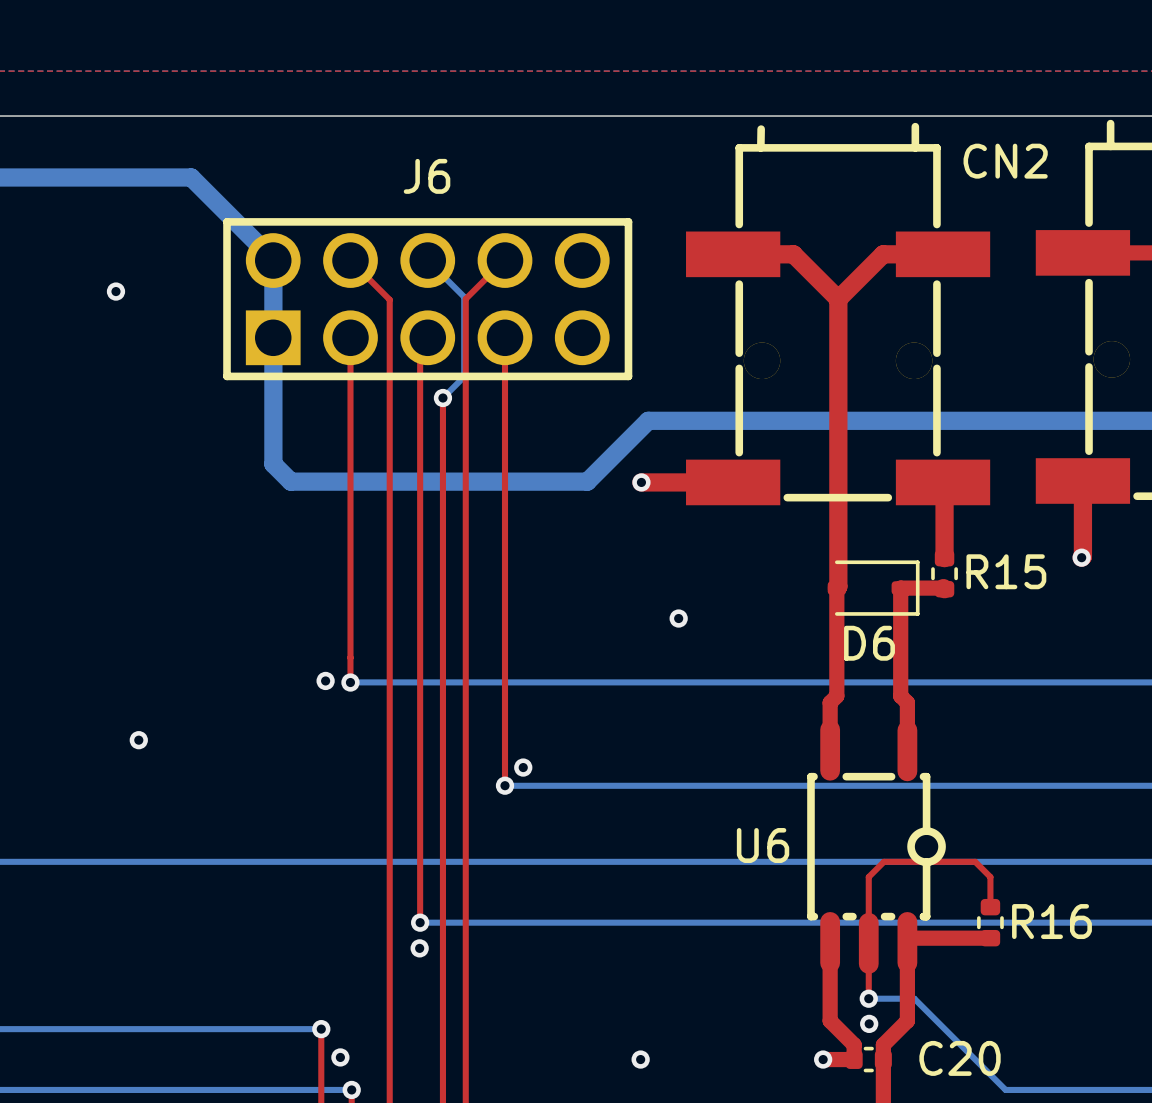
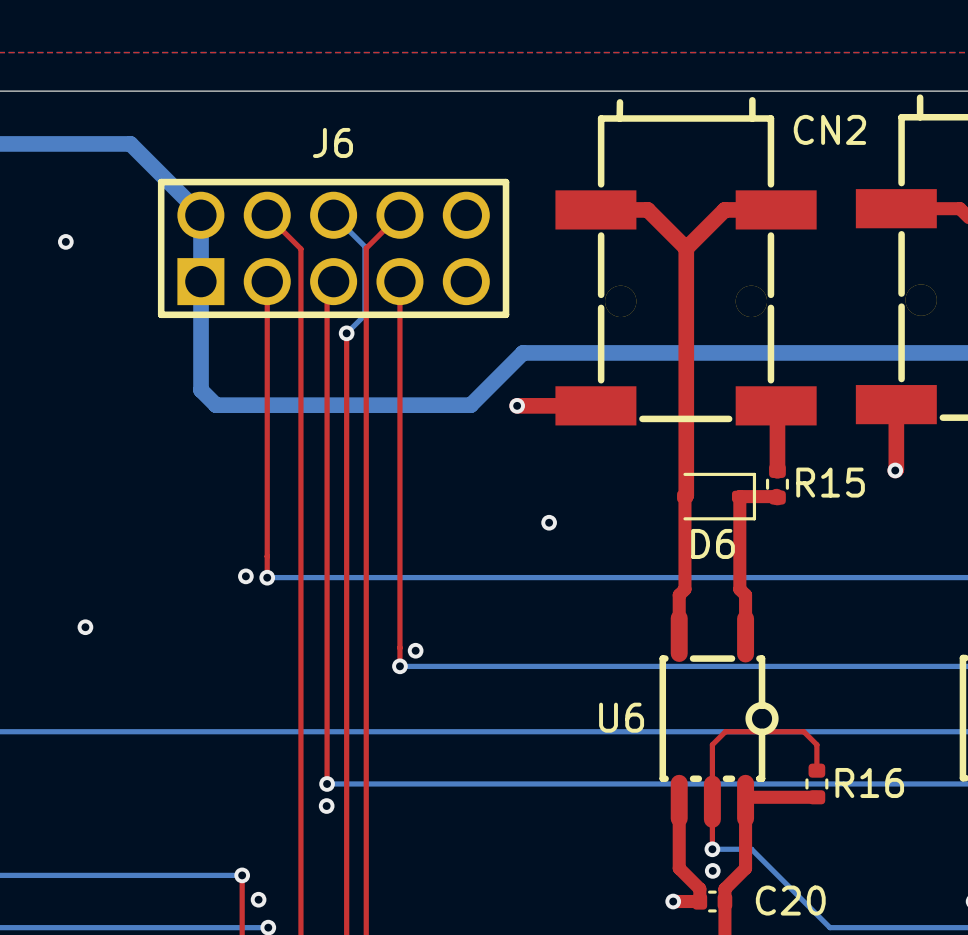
via: (640, 1059) -> none

